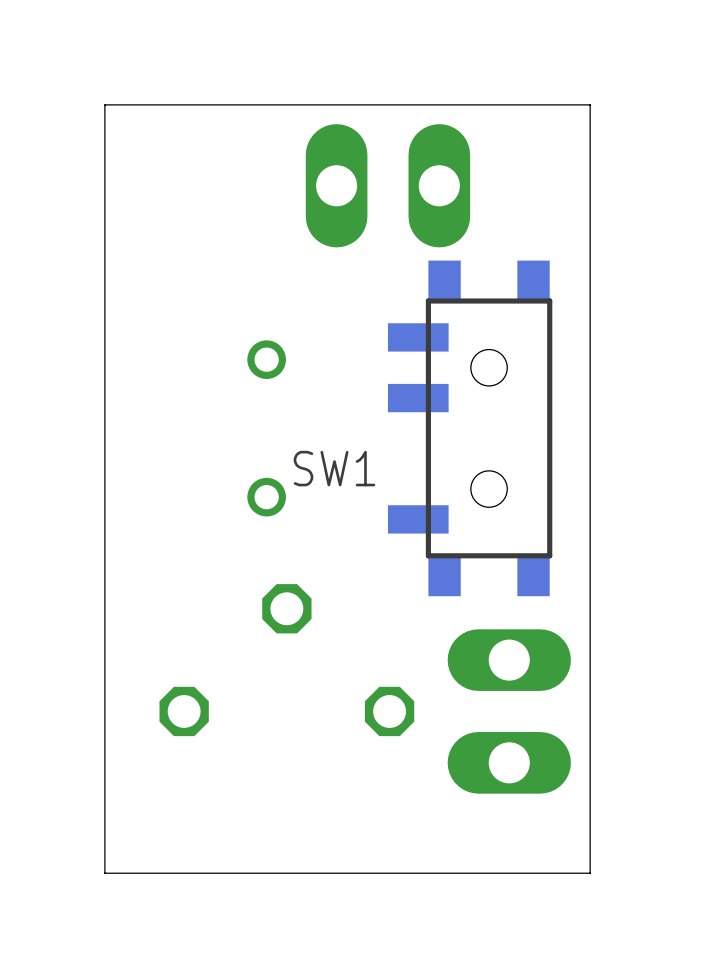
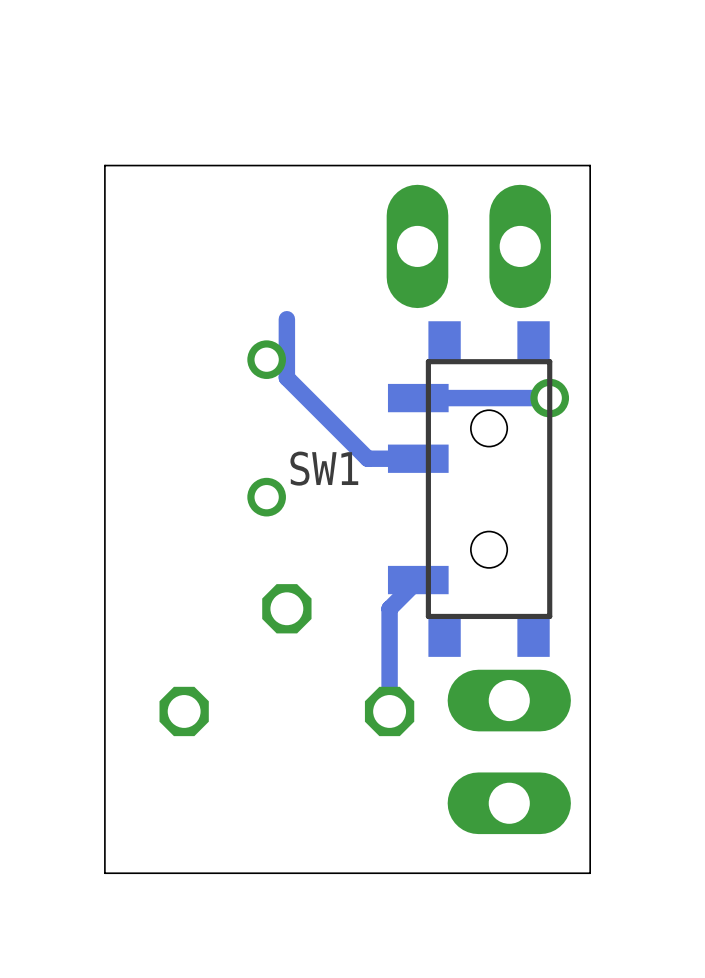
board edge: (590, 165) (590, 104) (104, 104) (104, 165) -> (590, 165) (104, 165)
part position: (387, 185) -> (468, 246)
track: none -> (286, 319) (286, 377) (367, 458) (418, 458)
track: none -> (549, 398) (418, 398)
via: none -> (549, 398)
SW1 position: (470, 428) -> (470, 489)
track: none -> (418, 580) (389, 608) (389, 711)
part position: (509, 711) -> (509, 751)

